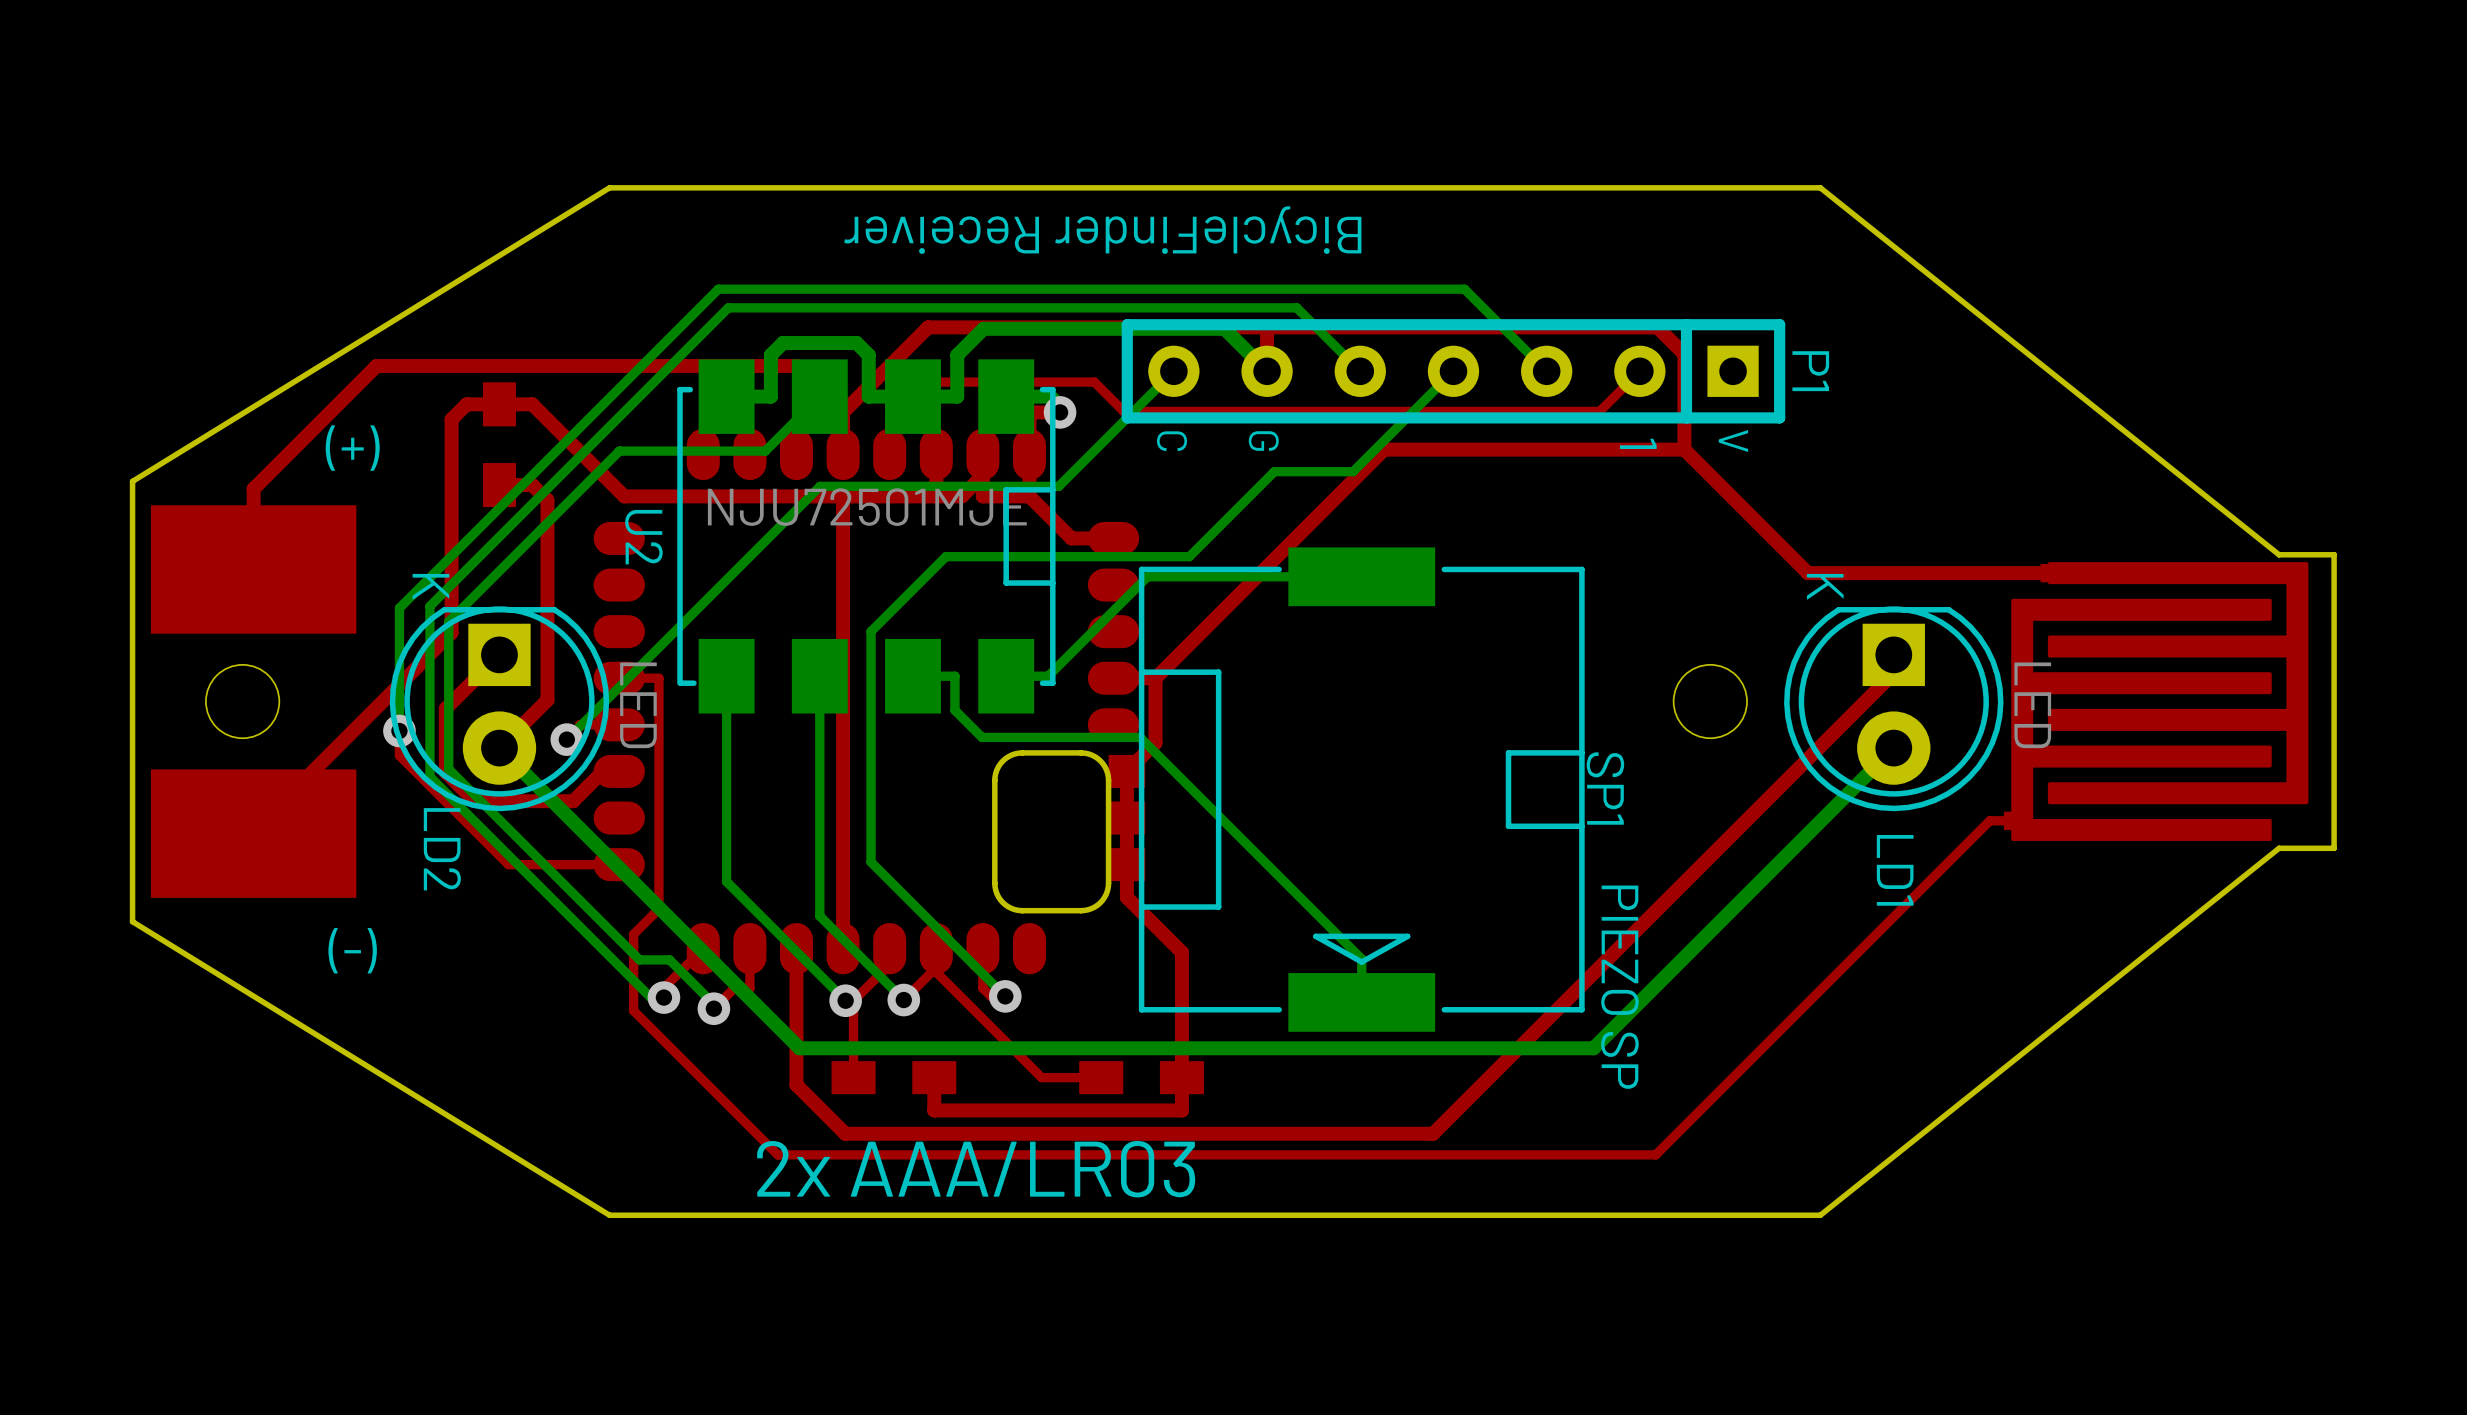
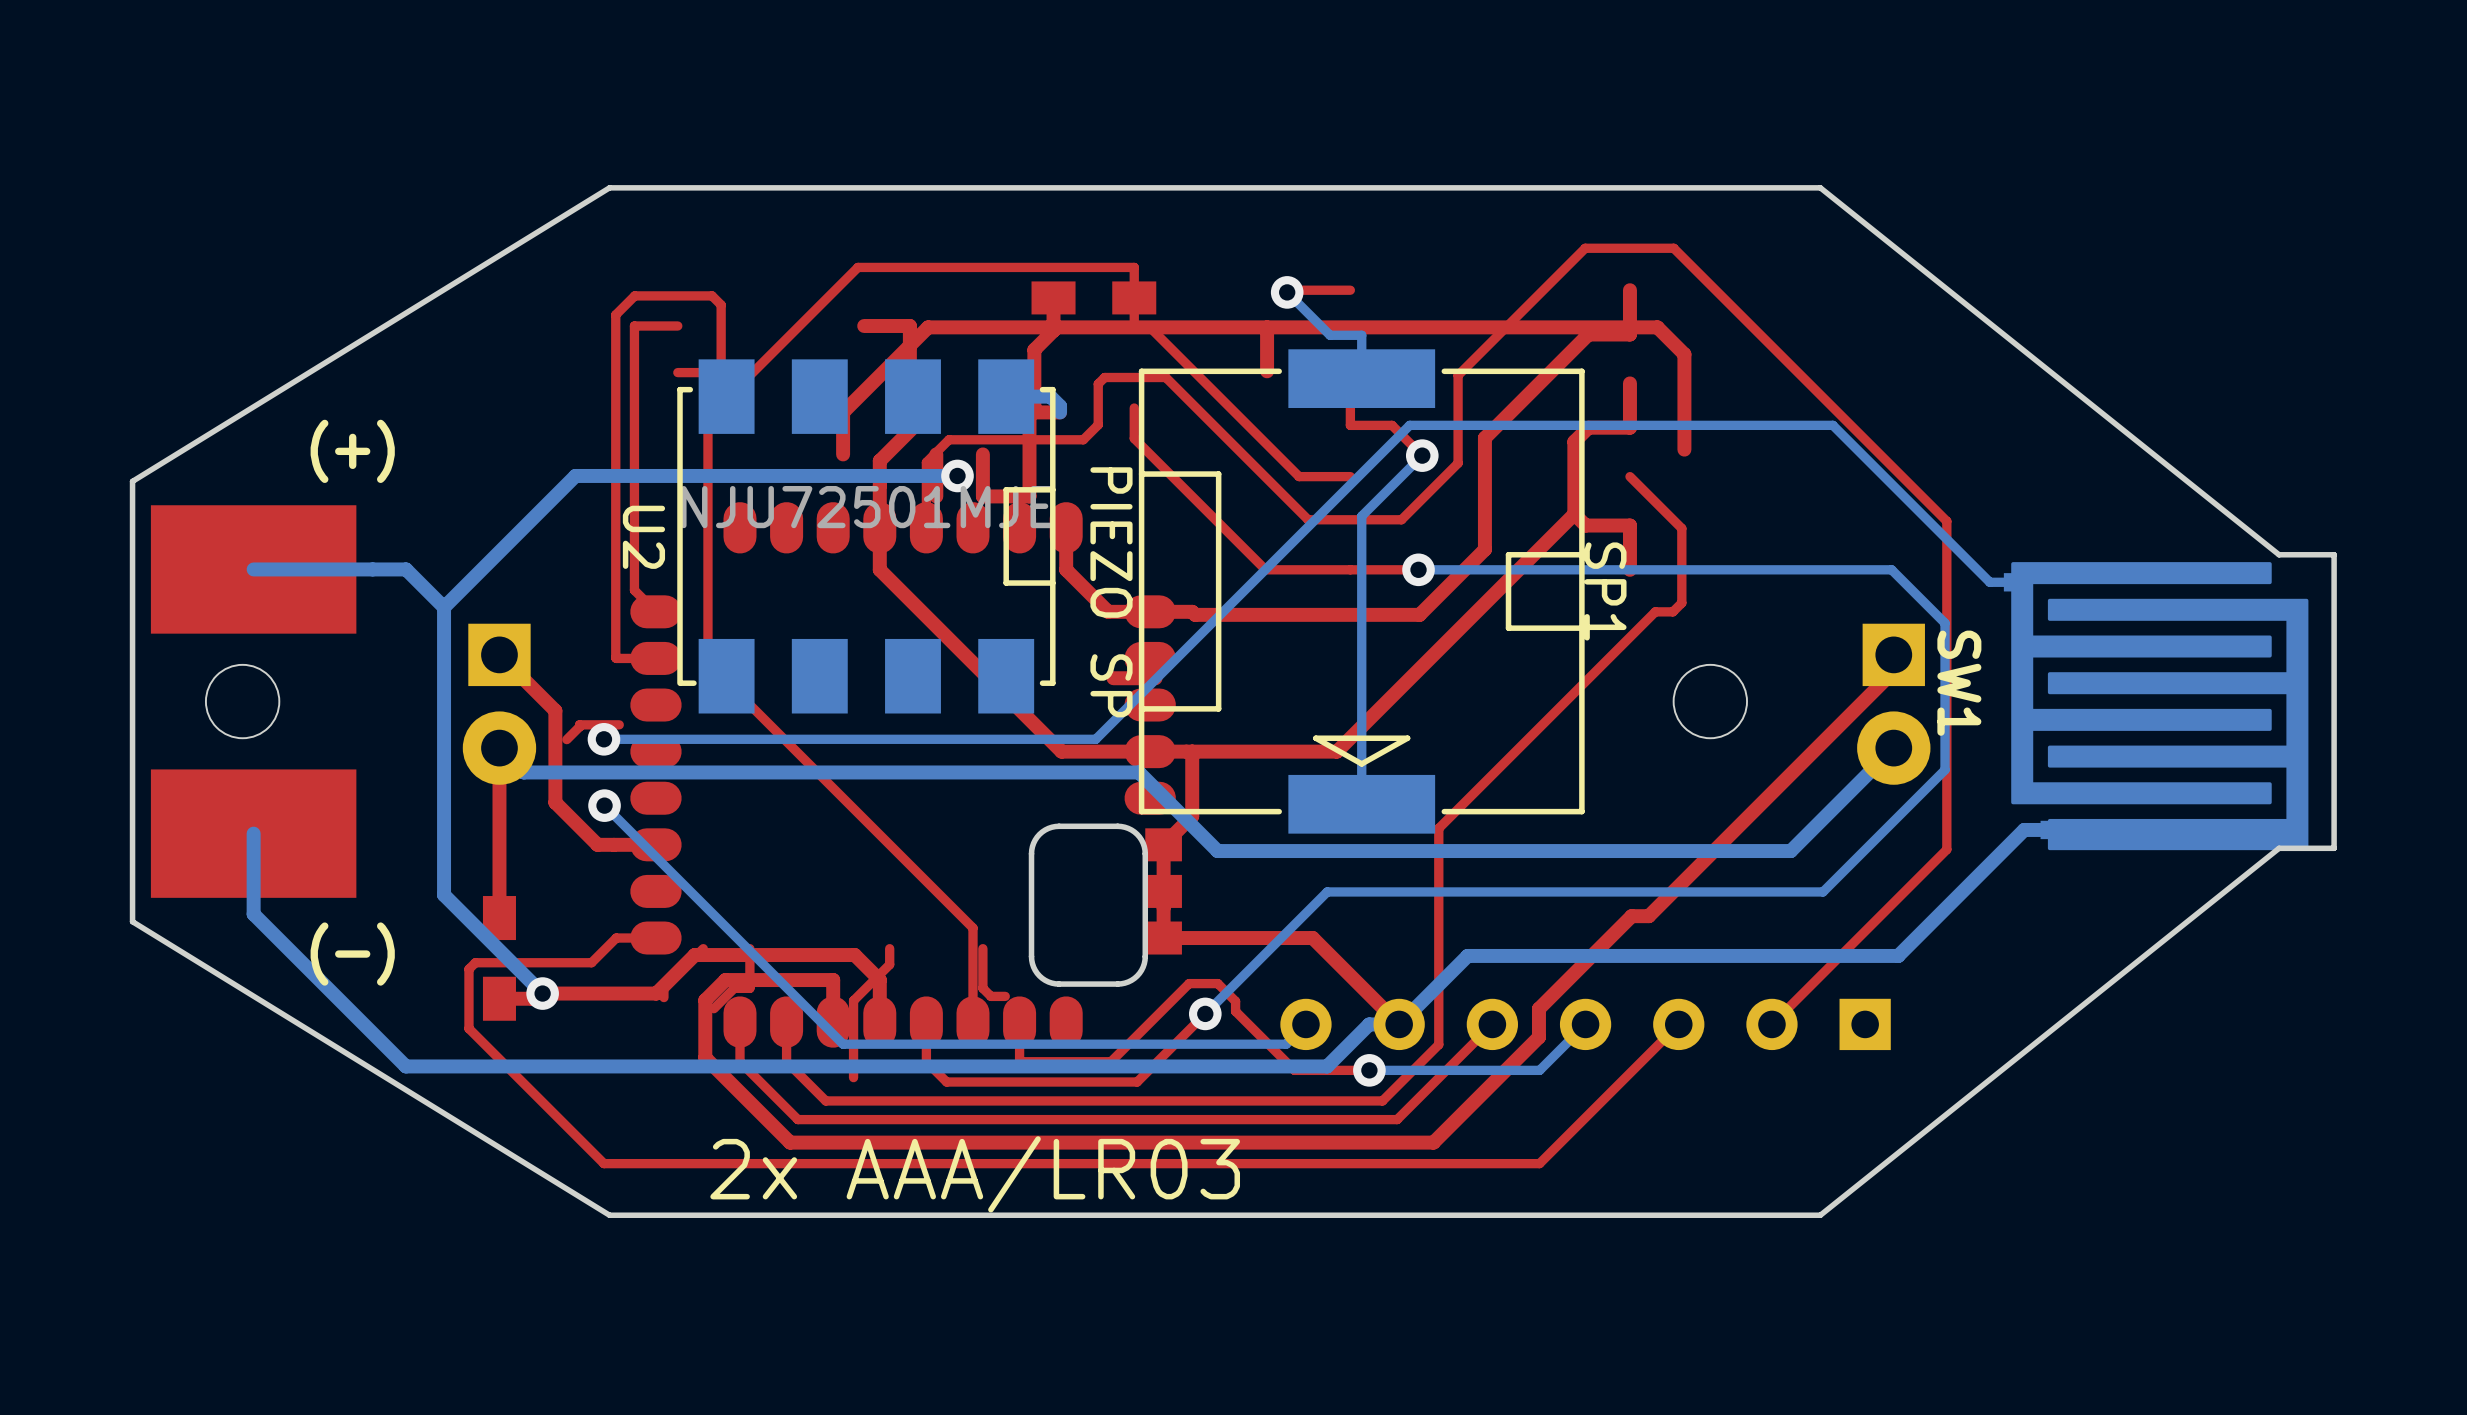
text: BicycleFinder Receiver (1102, 230) -> none
top track: none -> (1350, 290) (1299, 290) (1296, 292) (1287, 292)
top track: none -> (1629, 290) (1629, 334) (1588, 334) (1484, 438) (1484, 549) (1419, 614) (1195, 614) (1192, 611) (1108, 611) (1066, 569) (1066, 527)
bottom track: none -> (1287, 292) (1330, 335) (1361, 335) (1361, 378)
via: none -> (1287, 292)
top track: none -> (1053, 297) (1053, 330) (1034, 349) (1034, 408)
part: none -> (1093, 297)
top track: none -> (677, 325) (634, 325) (634, 590) (655, 611)
top track: none -> (864, 325) (909, 325) (909, 372) (932, 395) (932, 408) (879, 460) (879, 569) (1061, 751) (1336, 751) (1574, 514)
bottom track: (1173, 371) (1058, 486) (820, 486) (566, 739) -> none
bottom track: (1267, 371) (1224, 328) (983, 328) (957, 355) (957, 396) (868, 396) (868, 355) (856, 343) (782, 343) (770, 355) (770, 396) (726, 396) -> none
bottom track: (1360, 371) (1296, 307) (728, 307) (429, 606) (429, 776) (650, 997) (663, 997) -> none
bottom track: (1453, 371) (1353, 471) (1274, 471) (1189, 556) (945, 556) (871, 631) (871, 862) (1005, 996) -> none
P1 side: bottom (1453, 371) -> top (1585, 1024)
bottom track: (1546, 371) (1464, 289) (718, 289) (399, 608) (399, 731) -> none
top track: (1639, 371) (1599, 411) (1123, 411) (1094, 382) (922, 382) (889, 414) (889, 454) -> none
top track: none -> (677, 372) (721, 372) (721, 304) (712, 295) (634, 295) (615, 314) (615, 657) (655, 658)
top track: none -> (1350, 383) (1350, 425) (1392, 425) (1422, 455)
top track: none -> (1629, 383) (1629, 427) (1588, 427) (1574, 441) (1574, 514)
bottom track: (819, 396) (765, 451) (619, 451) (448, 621) (448, 769) (639, 959) (669, 959) (713, 1004) (713, 1008) -> none
top track: none -> (1134, 408) (1134, 438) (1265, 569) (1418, 569)
top track: (843, 412) (796, 365) (376, 365) (253, 488) (253, 569) -> none
via position: (1060, 412) -> (957, 475)
part: (499, 444) -> none
bottom track: none -> (1422, 455) (1361, 516) (1361, 804)
via: none -> (1422, 455)
bottom track: none -> (957, 475) (575, 475) (444, 607)
top track: (982, 475) (961, 496) (624, 496) (532, 404) (466, 404) (451, 419) (451, 632) (253, 830) (253, 833) -> none
top track: none -> (1350, 476) (1299, 476) (1150, 328) (1134, 328) (1134, 267) (857, 267) (707, 417) (707, 663) (972, 928) (972, 1022)
top track: none -> (1629, 476) (1681, 528) (1681, 602) (1672, 611) (1655, 611) (1438, 828) (1438, 1044) (1382, 1100) (825, 1100) (786, 1061) (786, 1022)
top track: (499, 485) (532, 485) (547, 500) (547, 700) (499, 748) -> (499, 918) (499, 748)
top track: (843, 496) (843, 948) -> none
top track: (1029, 496) (1071, 538) (1113, 538) -> none
top track: none -> (1574, 514) (1585, 525) (1629, 525) (1629, 569)
top track: none -> (926, 527) (926, 462) (949, 439) (1083, 439) (1098, 424) (1098, 383) (1104, 377) (1165, 377) (1308, 519) (1401, 519) (1458, 463) (1458, 375) (1585, 248) (1673, 248) (1946, 521) (1946, 849) (1771, 1024)
bottom track: none -> (253, 569) (406, 569) (444, 607)
bottom track: none -> (1418, 569) (1891, 569) (1945, 623) (1945, 769) (1823, 891) (1327, 891) (1205, 1013)
via: none -> (1418, 569)
top track: (2049, 573) (1807, 573) (1684, 449) (1384, 449) (1155, 678) (1155, 742) (1126, 771) (1126, 897) (1181, 952) (1181, 1110) (934, 1110) (934, 1077) -> none
bottom track: (1361, 576) (1147, 576) (1048, 676) (1006, 676) -> none
bottom track: none -> (2013, 582) (1989, 582) (1832, 425) (1409, 425) (1095, 739) (603, 739)
bottom track: none -> (444, 607) (444, 894) (542, 993)
top track: (499, 654) (445, 708) (445, 772) (474, 801) (573, 801) (603, 771) (619, 771) -> (499, 654) (555, 710) (555, 802) (597, 844) (655, 844)
top track: (1893, 671) (1433, 1133) (845, 1133) (796, 1084) (796, 948) -> (1893, 671) (1648, 916) (1631, 916) (1538, 1008) (1538, 1037) (1433, 1142) (790, 1142) (705, 1057) (705, 1000) (725, 980) (833, 980) (833, 1022)
bottom track: (726, 676) (726, 881) (845, 1000) -> none
bottom track: (819, 676) (819, 916) (903, 1000) -> none
bottom track: (913, 676) (954, 676) (954, 710) (982, 737) (1140, 737) (1361, 959) (1361, 1002) -> none
top track: (619, 678) (658, 678) (658, 908) (633, 934) (633, 1010) (777, 1154) (1655, 1154) (1989, 820) (2013, 820) -> none
part position: (869, 701) -> (906, 774)
SW1 side: top (2156, 701) -> bottom (2156, 706)
LD2 side: bottom (499, 708) -> top (499, 704)
LD1 side: bottom (1893, 708) -> top (1893, 704)
top track: (399, 731) (399, 755) (508, 864) (619, 864) -> none
via: (399, 731) -> none
via position: (566, 739) -> (603, 739)
top track: none -> (1192, 751) (1192, 816) (1163, 844) (1163, 938) (1312, 938) (1399, 1024)
bottom track: (523, 772) (799, 1048) (1593, 1048) (1790, 851) -> (523, 772) (1139, 772) (1217, 851) (1790, 851)
SP1 position: (1361, 789) -> (1361, 591)
bottom track: none -> (604, 805) (843, 1044) (1286, 1044) (1305, 1024)
via: none -> (604, 805)
bottom track: none -> (2049, 829) (2024, 829) (1898, 955) (1467, 955) (1399, 1024) (1369, 1024) (1327, 1066) (405, 1066) (253, 914) (253, 833)
top track: none -> (655, 938) (616, 938) (591, 962) (475, 962) (468, 969) (468, 1028) (603, 1163) (1539, 1163) (1678, 1024)
part: none -> (499, 958)
top track: (936, 972) (931, 972) (903, 1000) -> none
top track: (936, 972) (1041, 1077) (1101, 1077) -> none
SP1 value position: PIEZO SP (1619, 987) -> PIEZO SP (1111, 592)
via: none -> (542, 993)
via: (1005, 996) -> none
via: (663, 997) -> none
top track: none -> (499, 998) (537, 998) (542, 993) (656, 993) (694, 955) (854, 955) (879, 980) (879, 1022)
via: (845, 1000) -> none
via: (903, 1000) -> none
via: (713, 1008) -> none
top track: none -> (1205, 1013) (1137, 1082) (946, 1082) (926, 1061) (926, 1022)
via: none -> (1205, 1013)
top track: none -> (739, 1022) (739, 1061) (797, 1119) (1397, 1119) (1492, 1024)
top track: none -> (1019, 1022) (1019, 1061) (1111, 1061) (1189, 983) (1217, 983) (1235, 1001) (1235, 1011) (1294, 1070) (1369, 1070)
bottom track: none -> (1585, 1024) (1539, 1070) (1369, 1070)
via: none -> (1369, 1070)
part: (893, 1077) -> none
part: (1141, 1077) -> none

